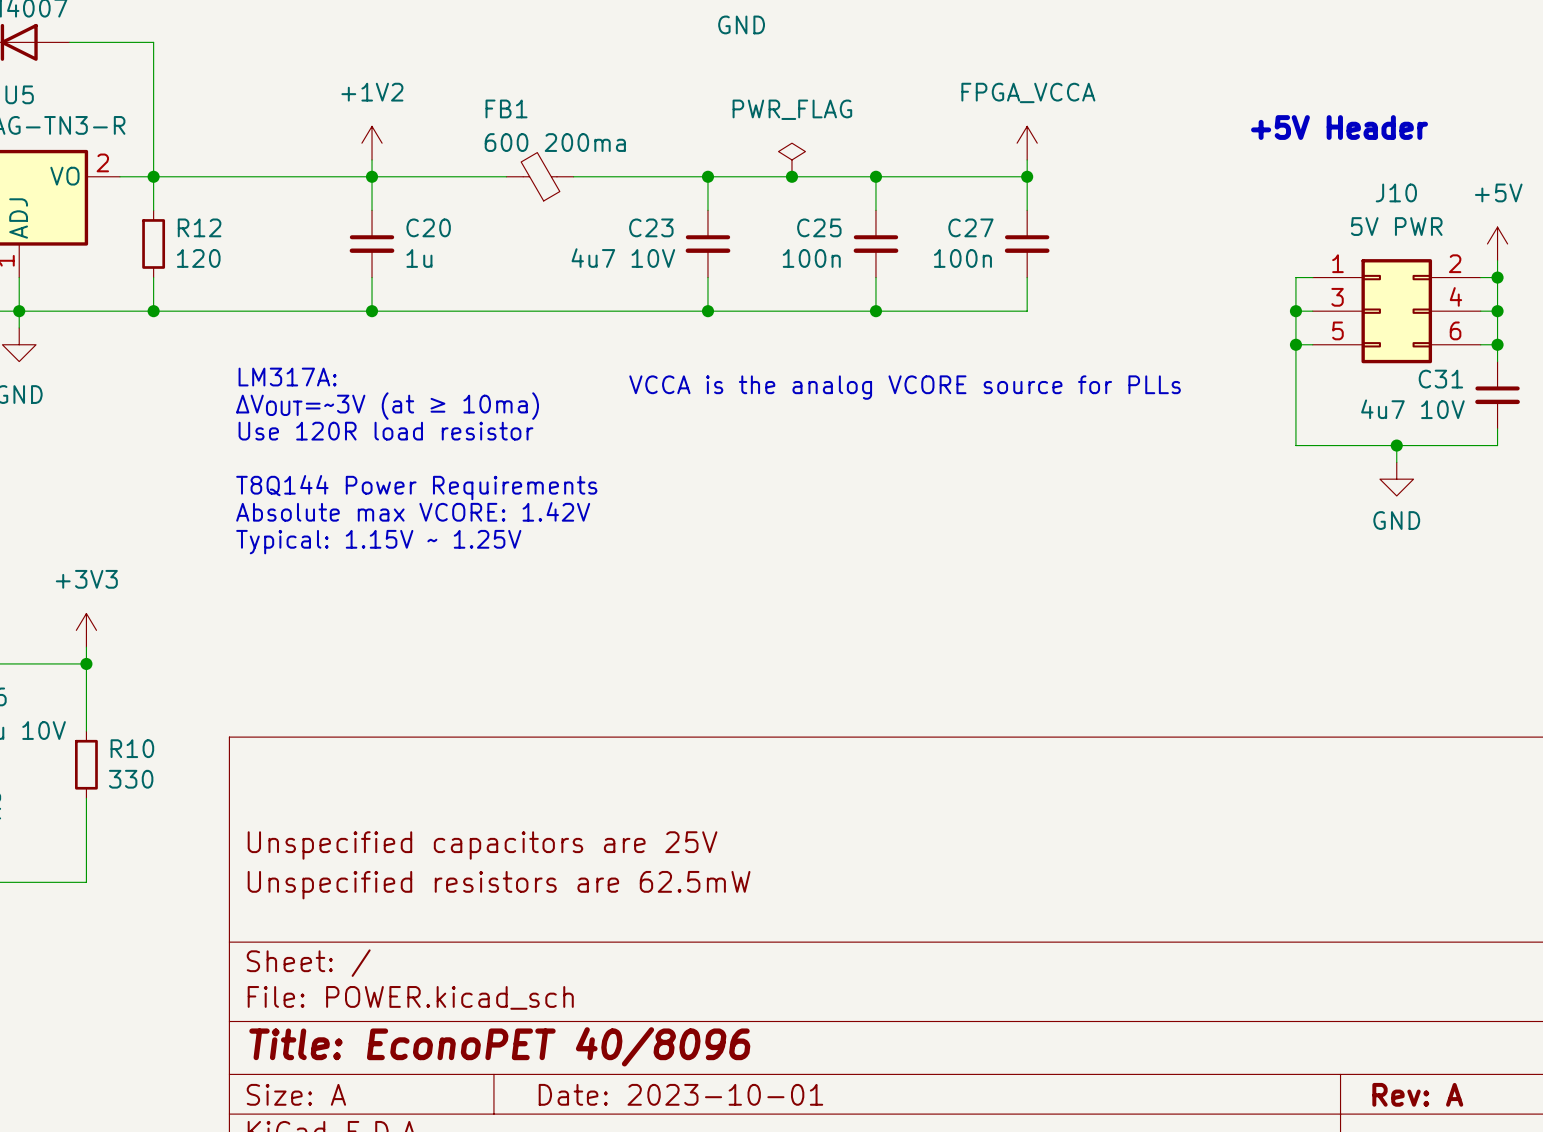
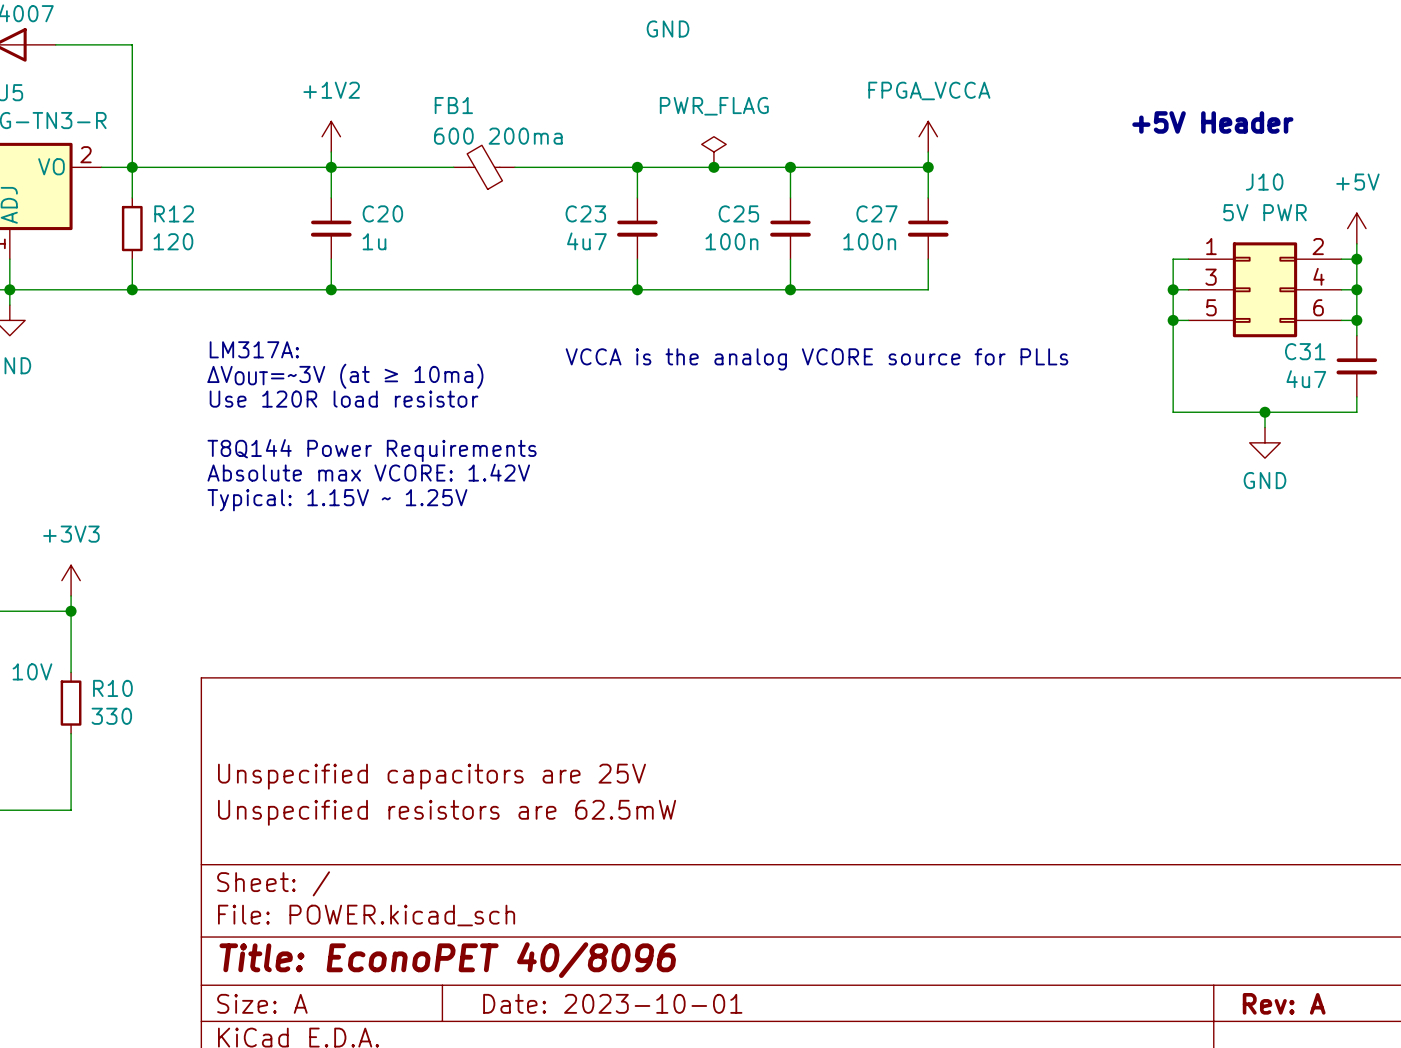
C23 value: 4u7 10V (623, 258) -> 4u7 (586, 241)
C31 value: 4u7 10V (1412, 409) -> 4u7 (1306, 379)

